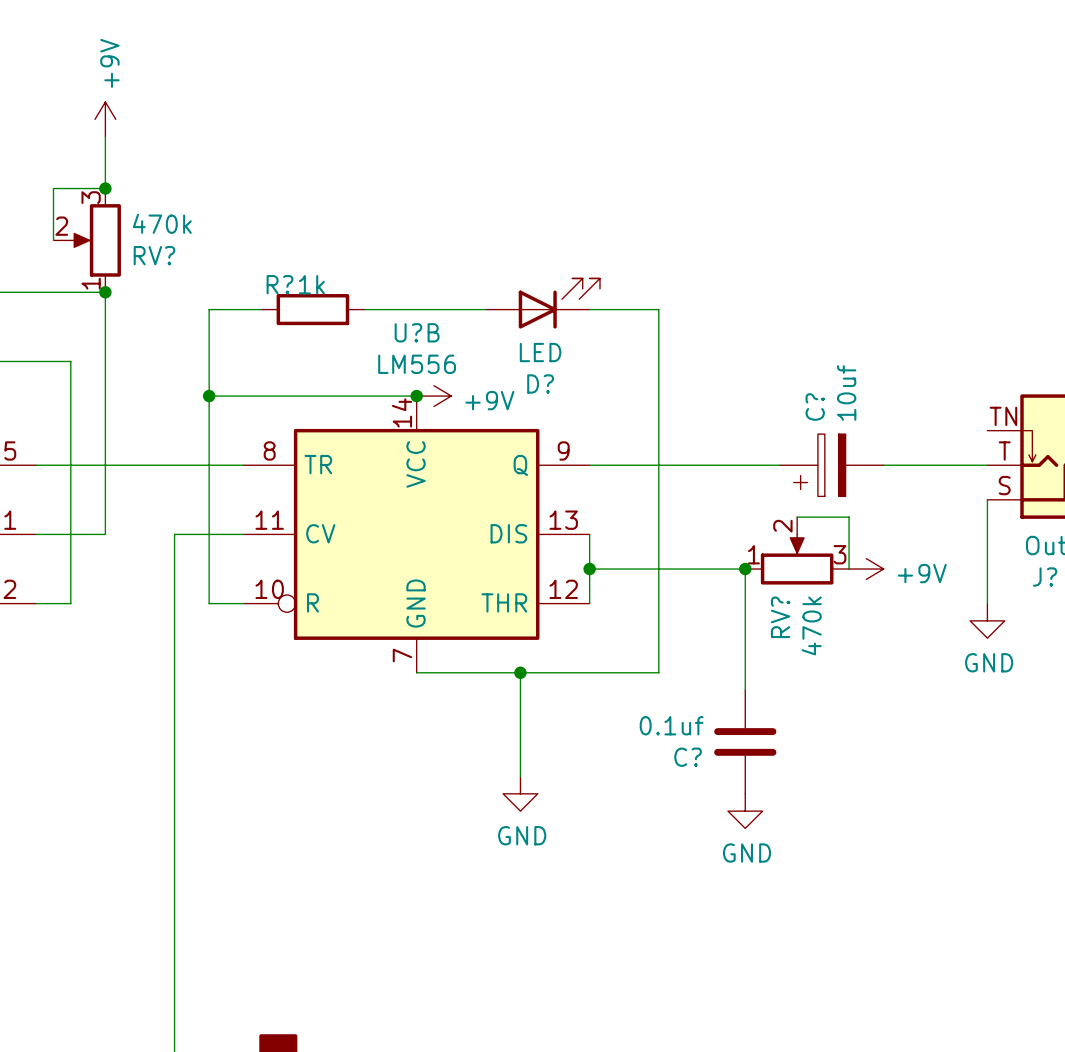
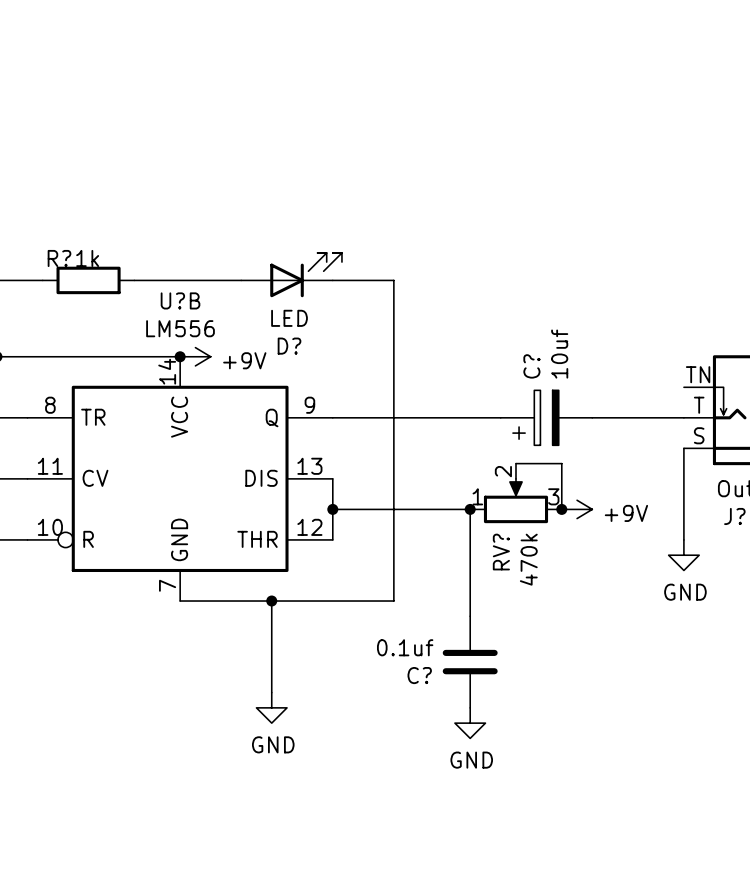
junction: none -> (561, 509)

